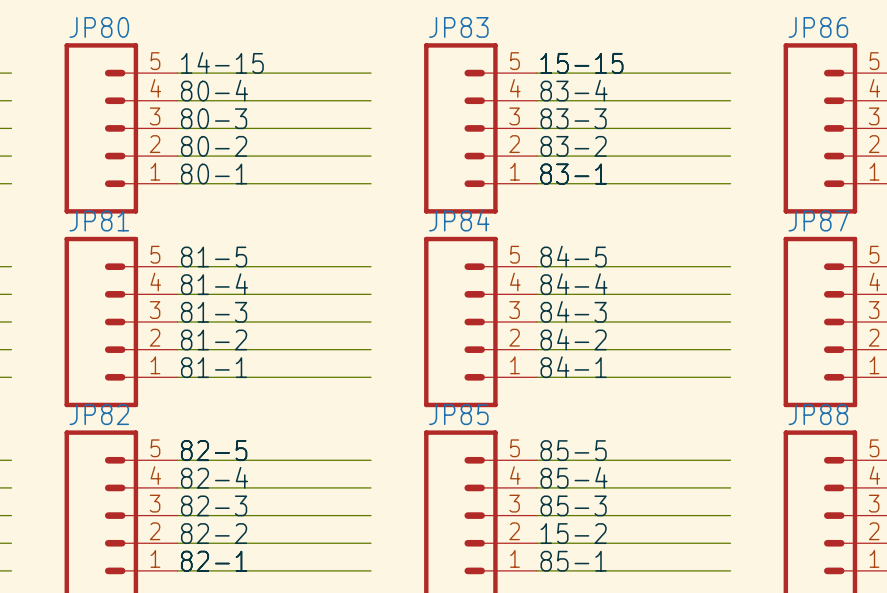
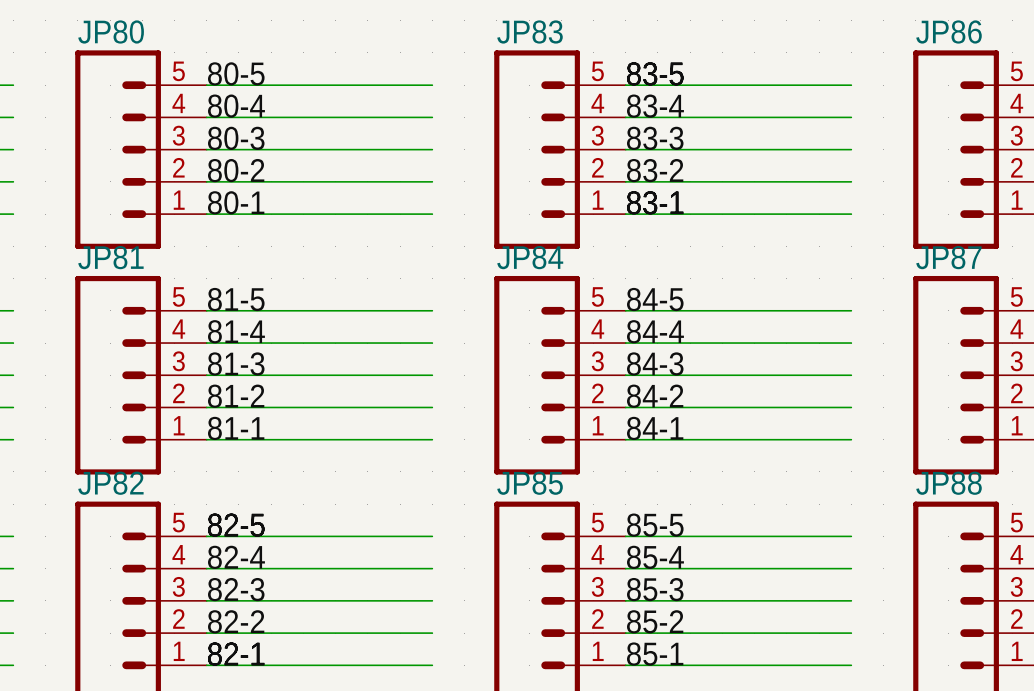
label: 14-15 (222, 62) -> 80-5 (236, 73)
label: 15-15 (581, 63) -> 83-5 (655, 73)
label: 15-2 (573, 533) -> 85-2 (655, 621)

